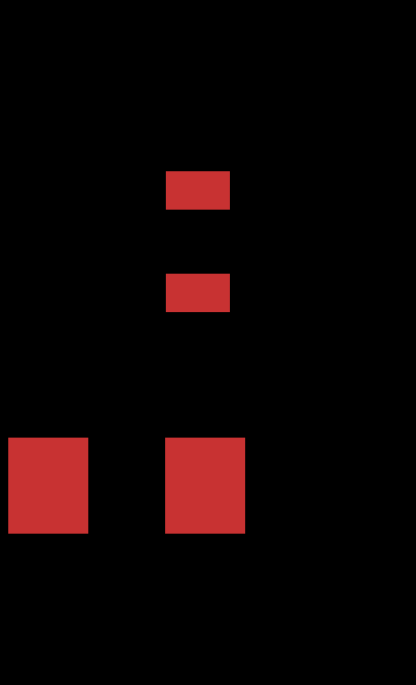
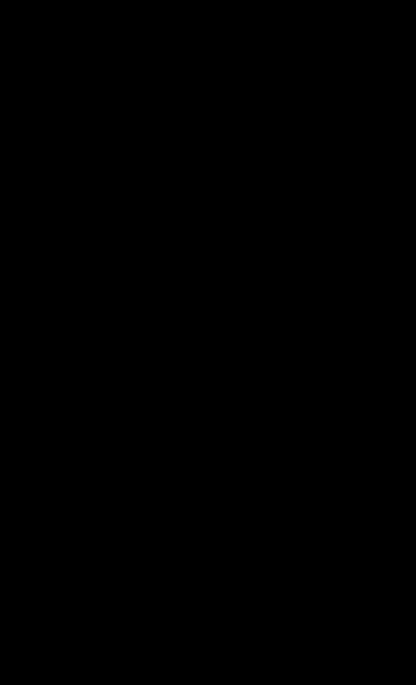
part: (197, 241) -> none
part: (126, 485) -> none

